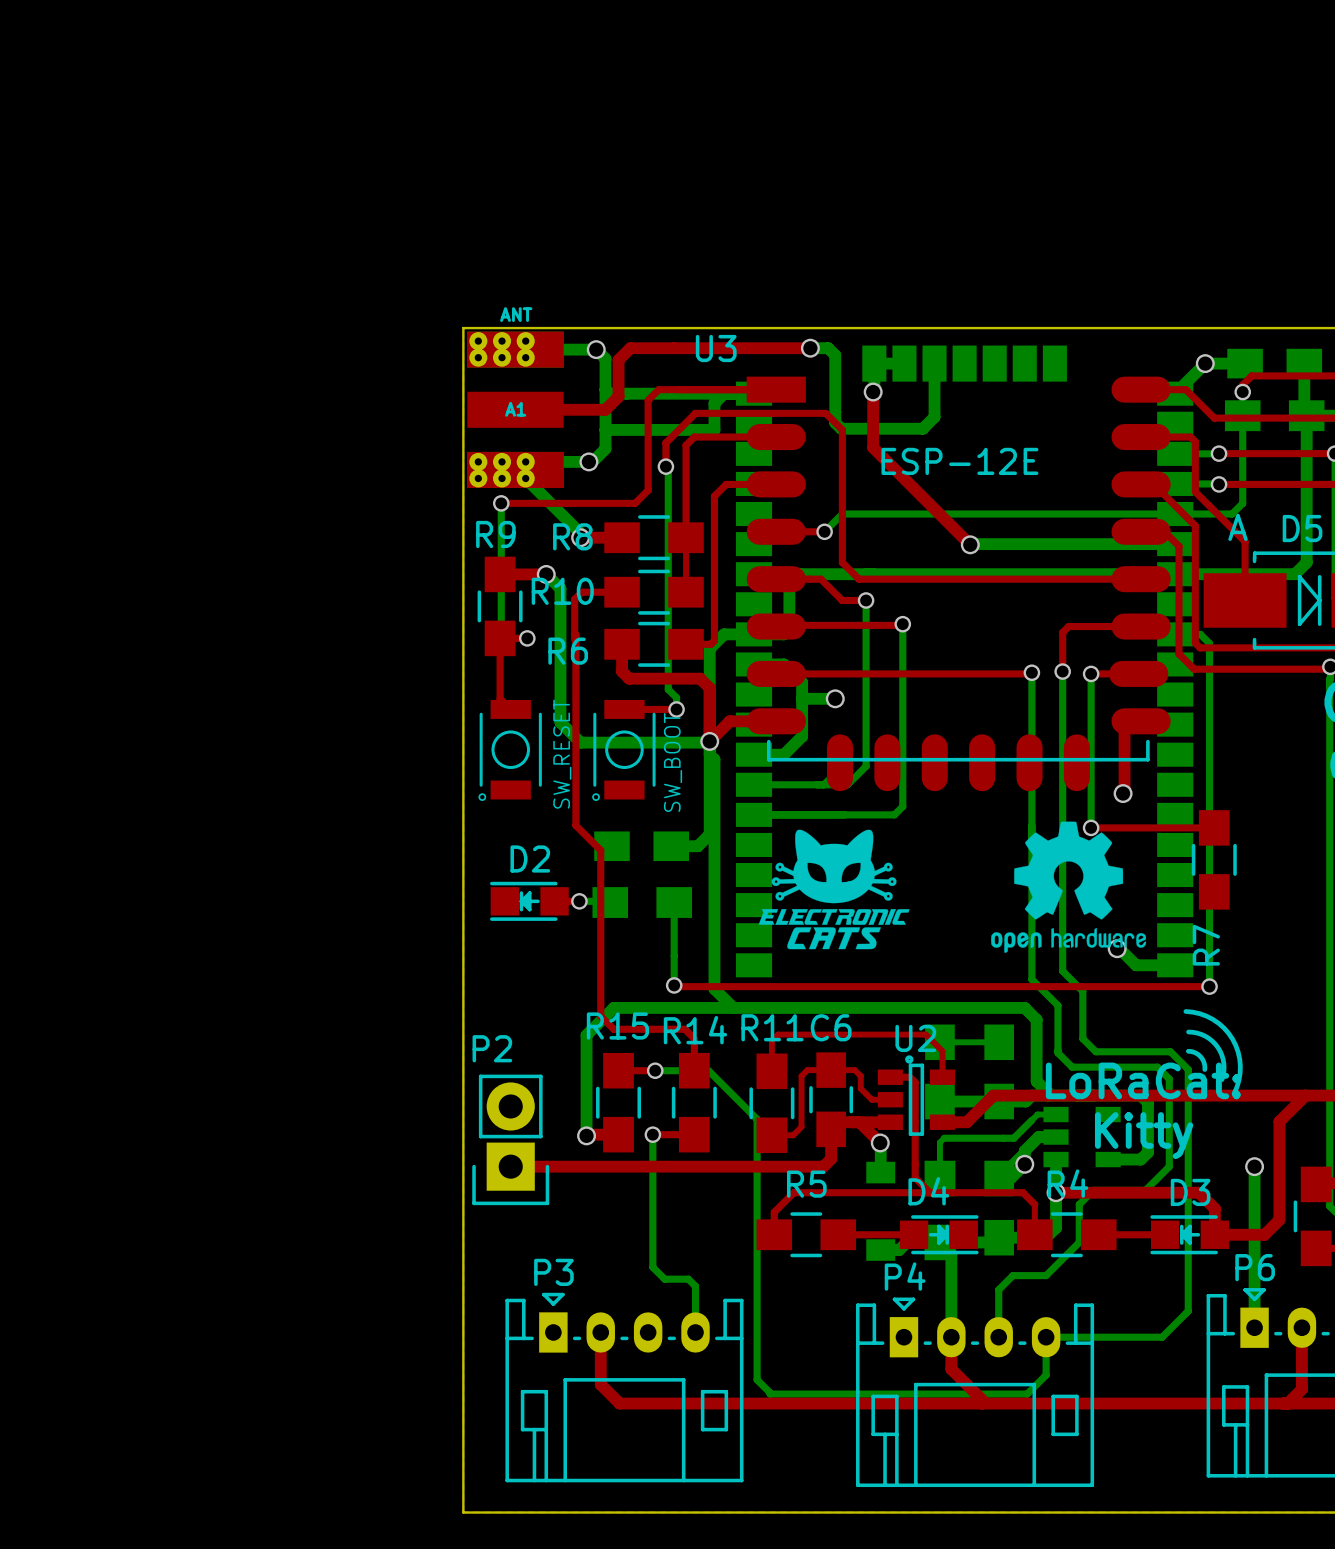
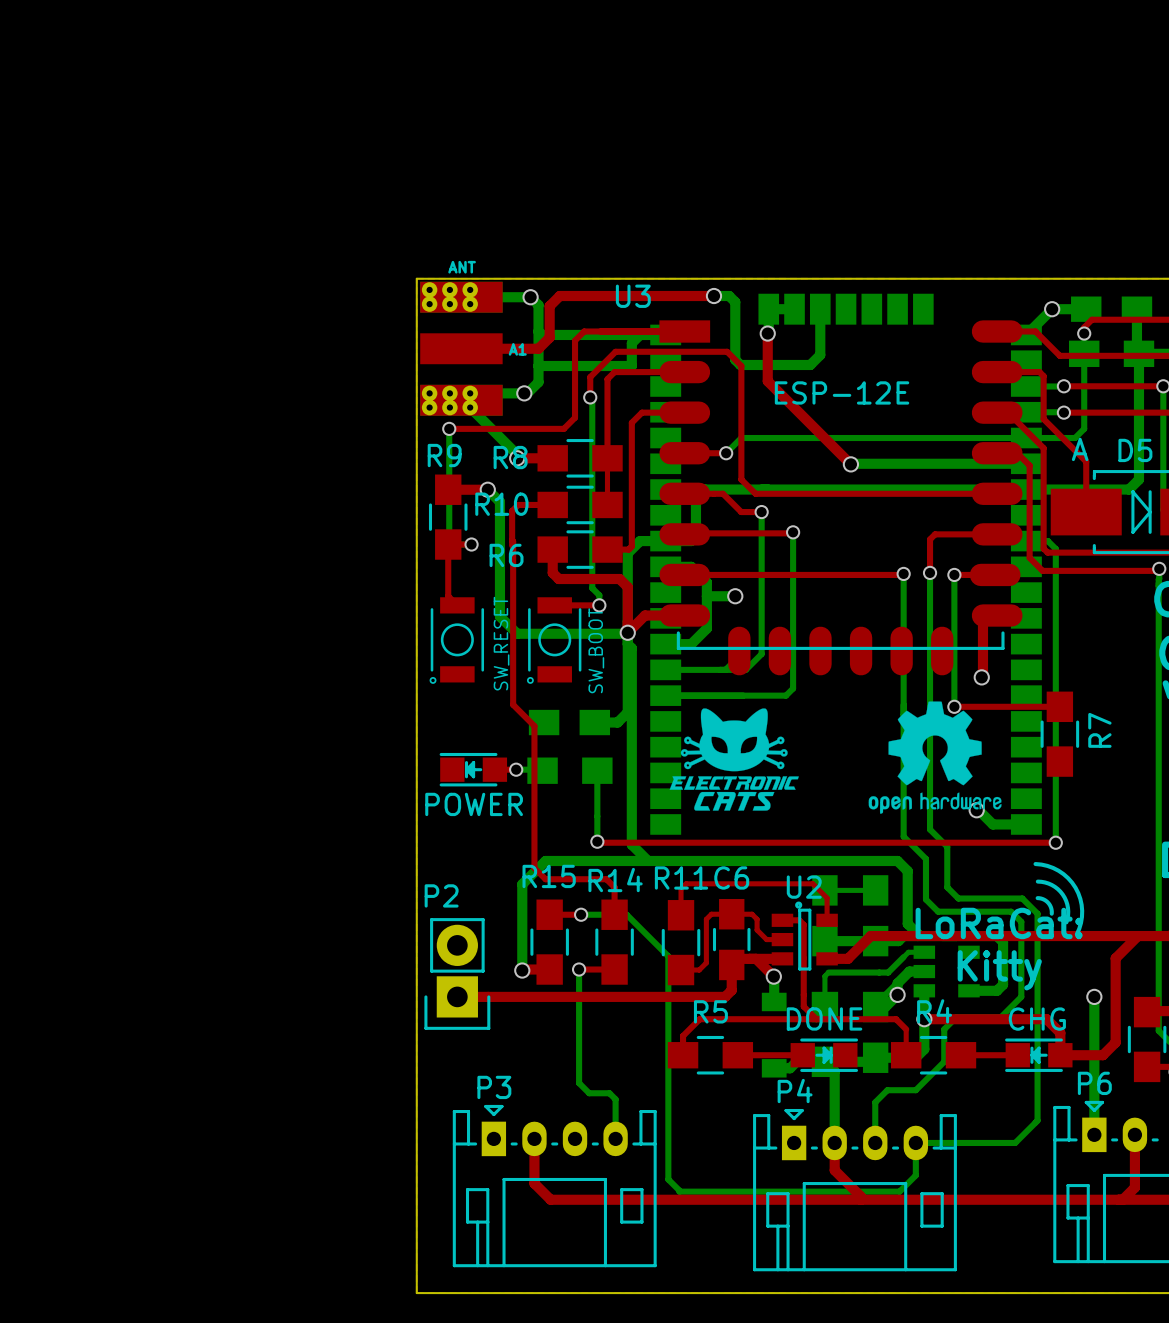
A1 name position: A1 (515, 409) -> A1 (517, 349)
D2 name: D2 (530, 859) -> none
D2 value: none -> POWER (474, 804)
R7 name position: R7 (1206, 945) -> R7 (1099, 730)
D4 name: D4 (928, 1191) -> none
D4 value: none -> DONE (824, 1018)
D3 value: none -> CHG (1037, 1019)
D3 name: D3 (1190, 1192) -> none

